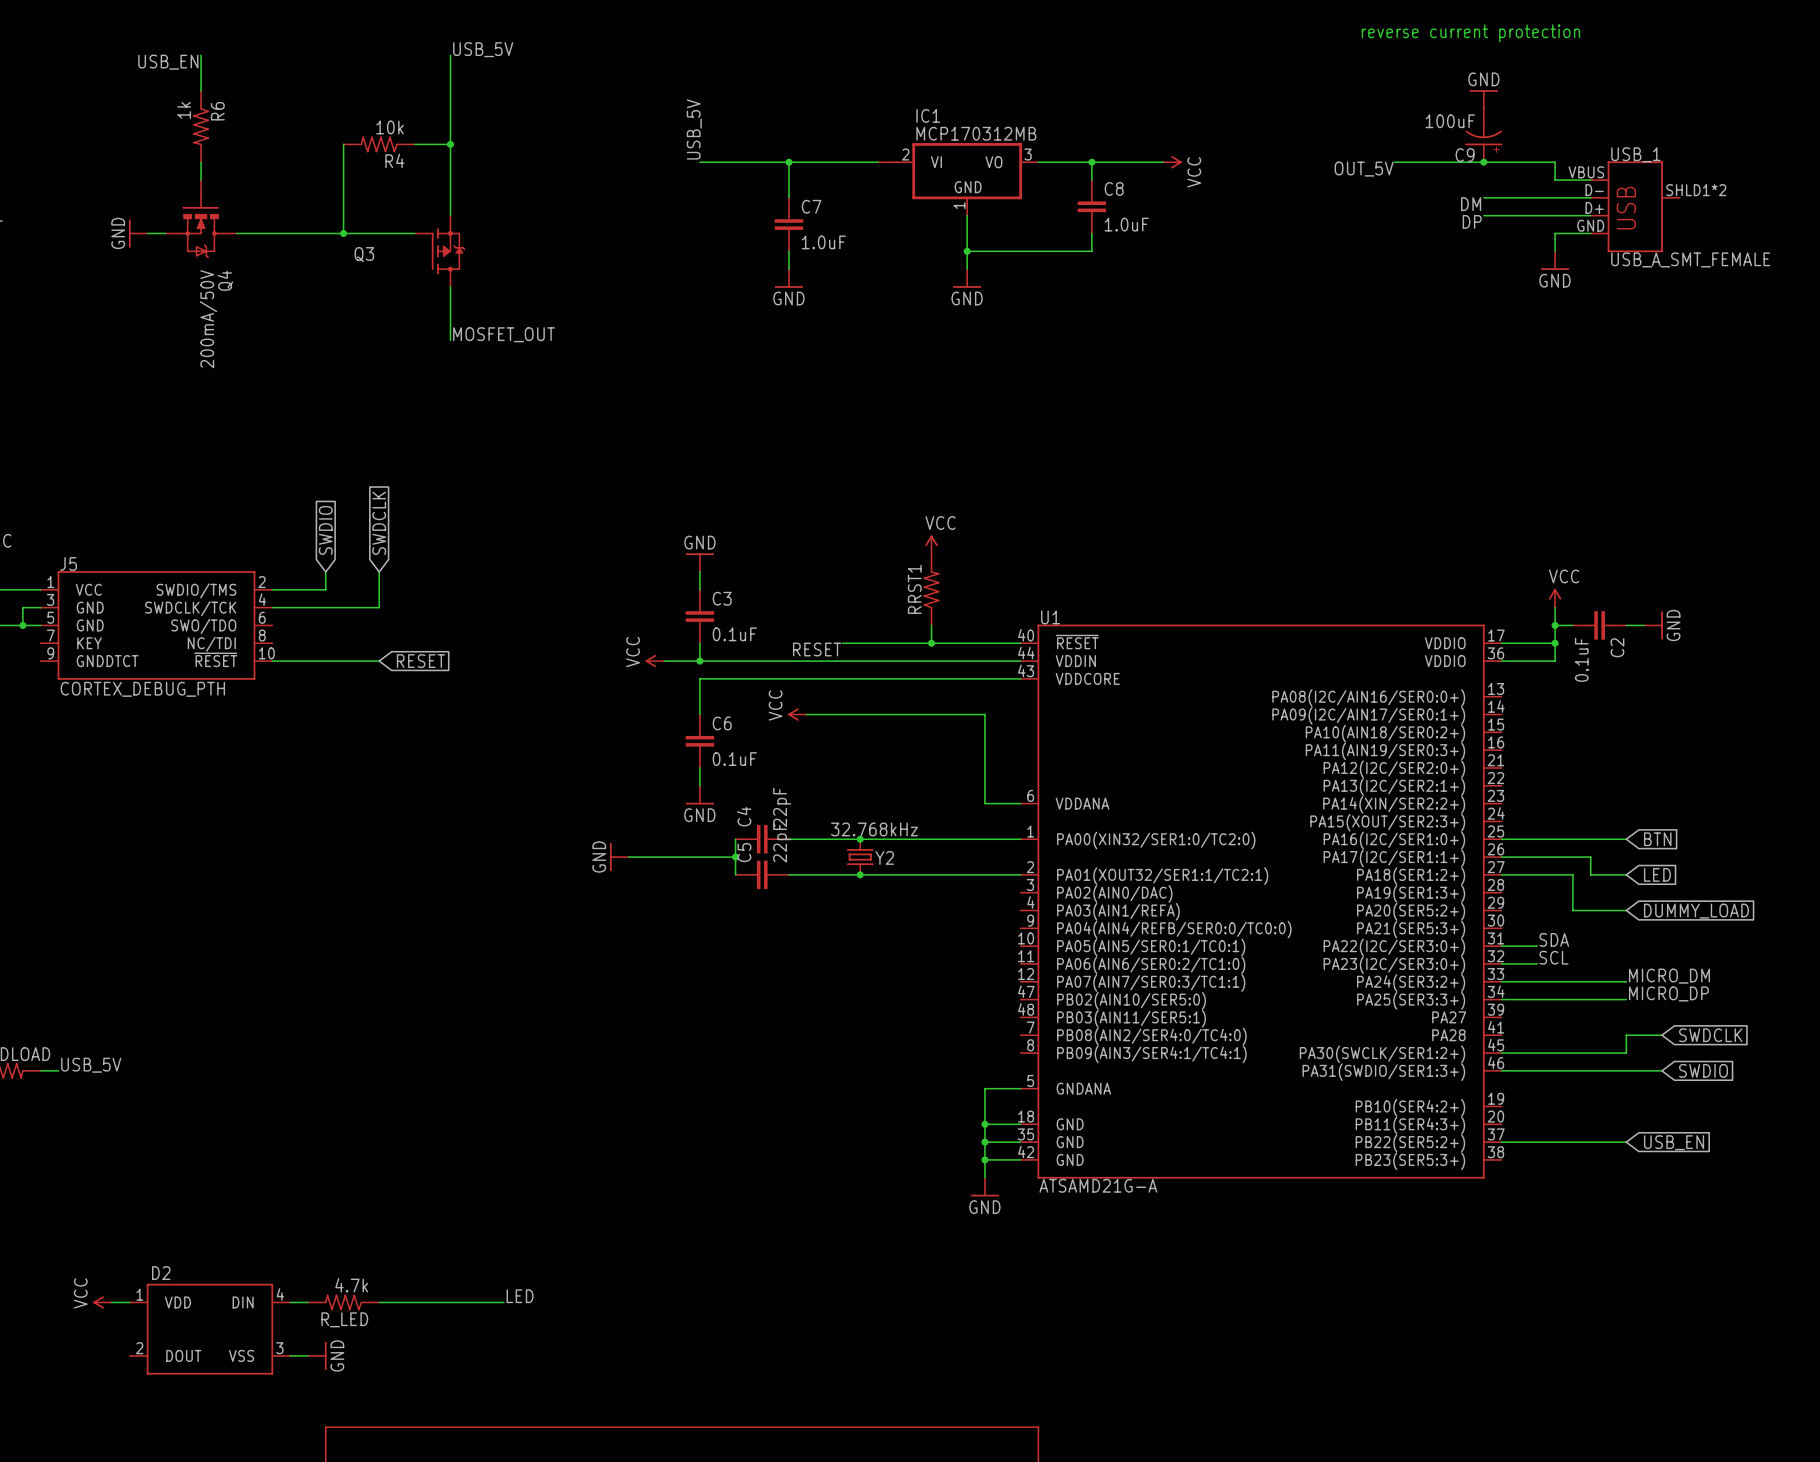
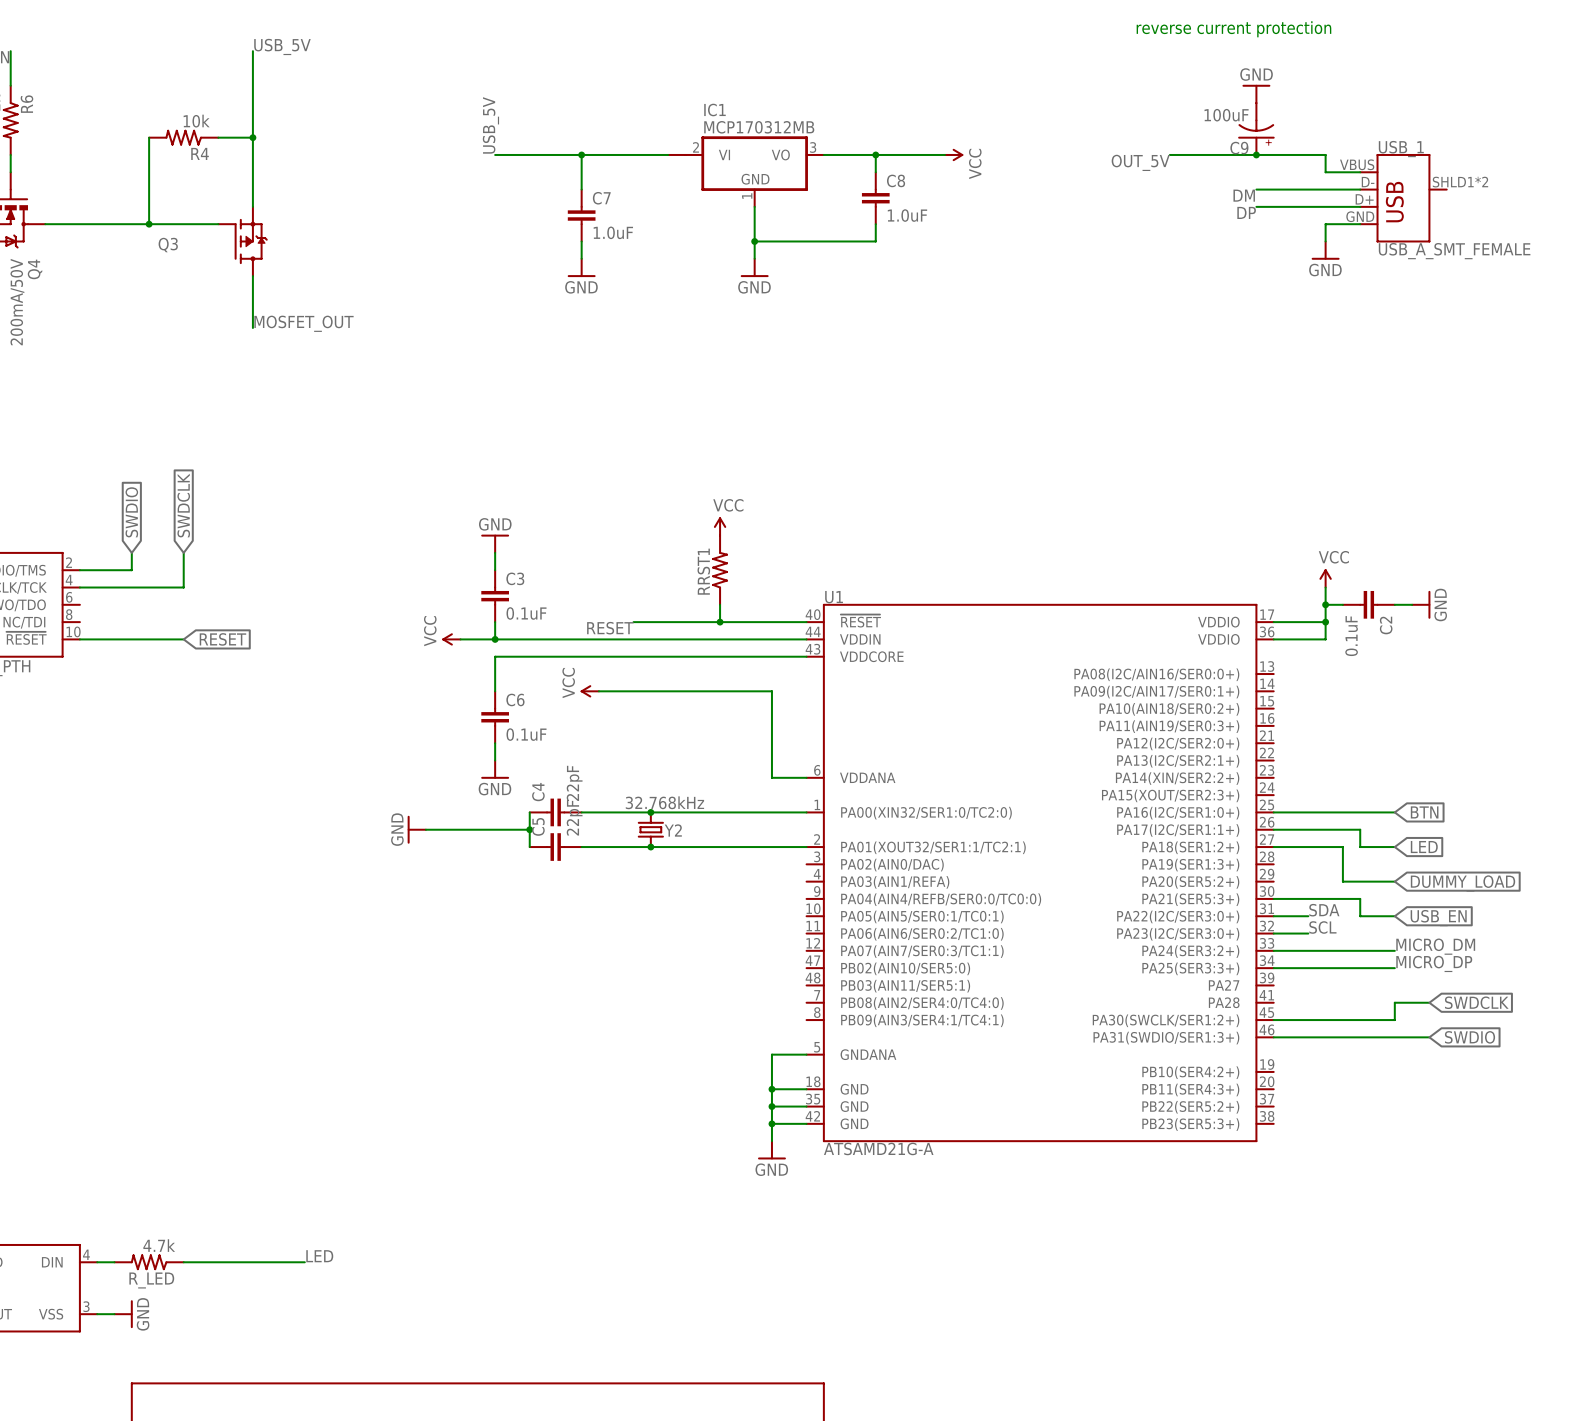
wire: none -> (1273, 898) (1360, 898) (1360, 916) (1394, 916)
global label: none -> USB_EN (1438, 918)
wire: (1501, 1142) (1626, 1142) -> none
global label: USB_EN (1674, 1142) -> none

